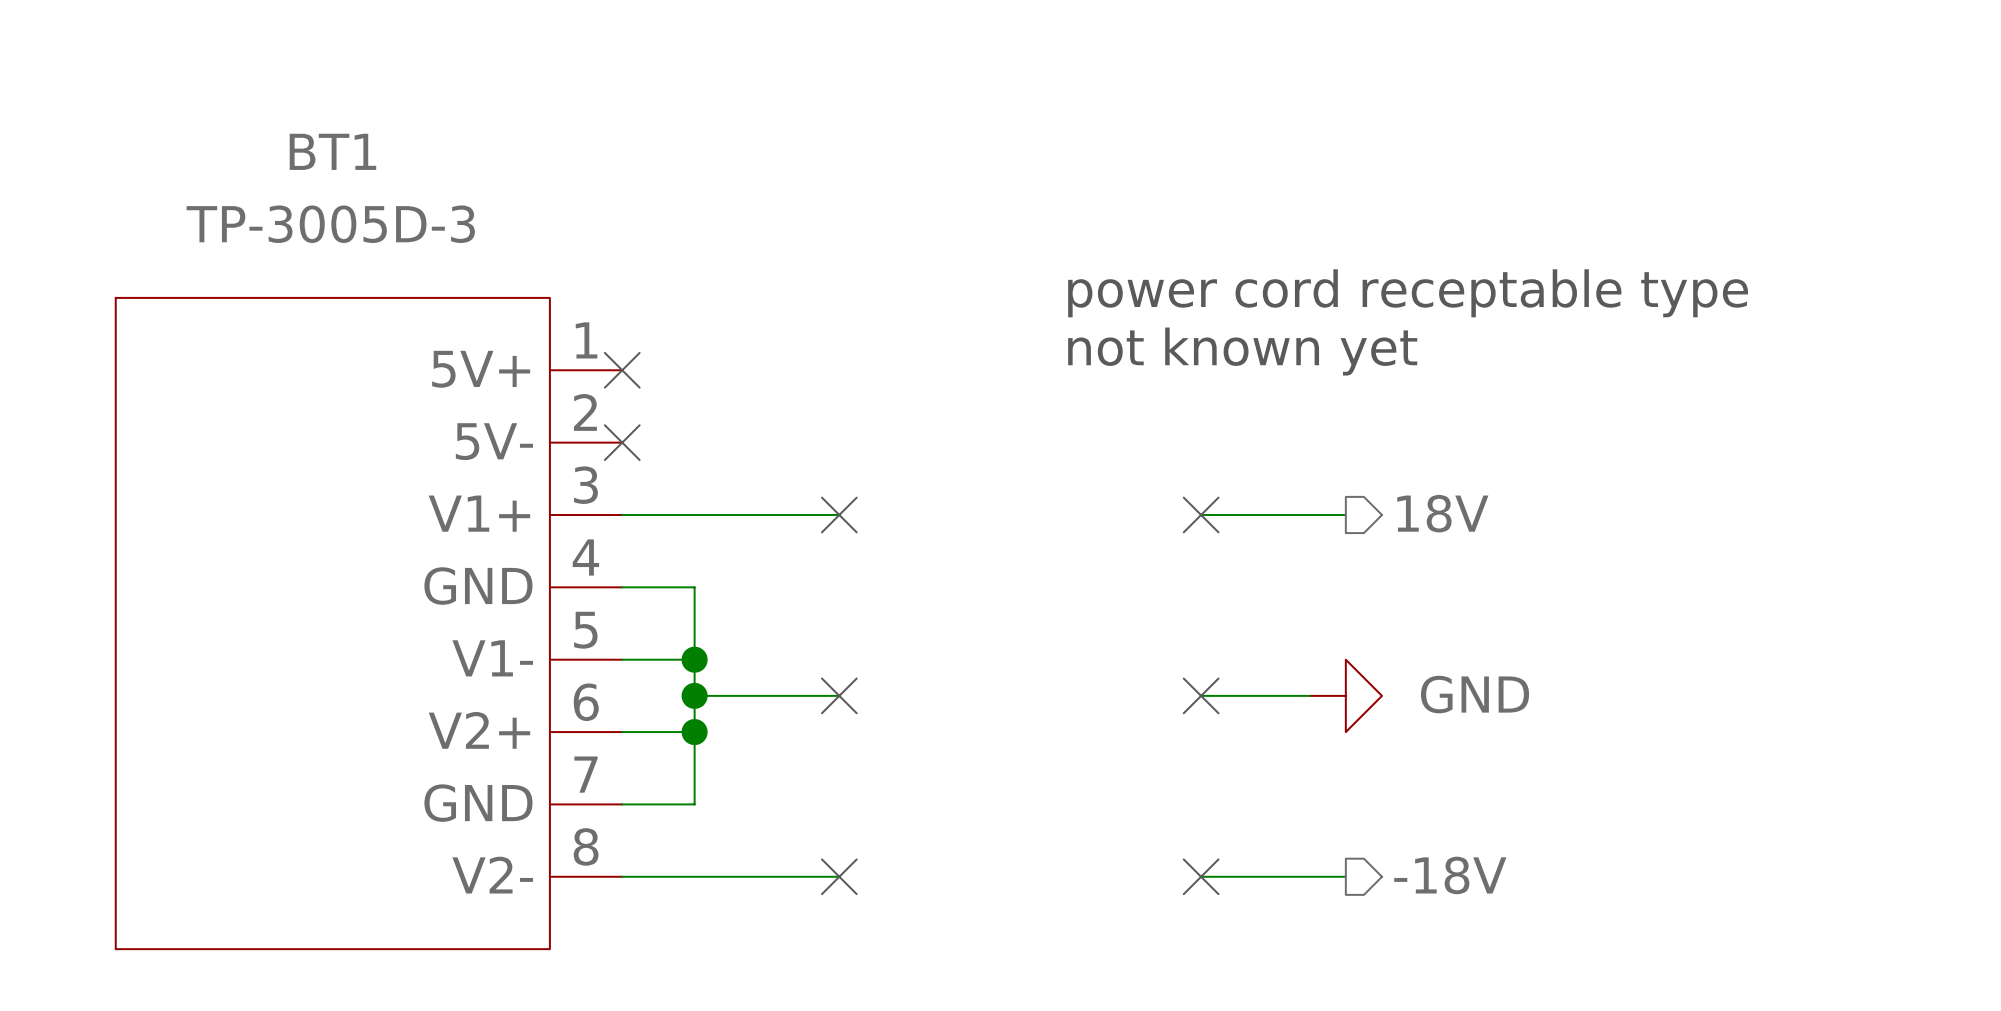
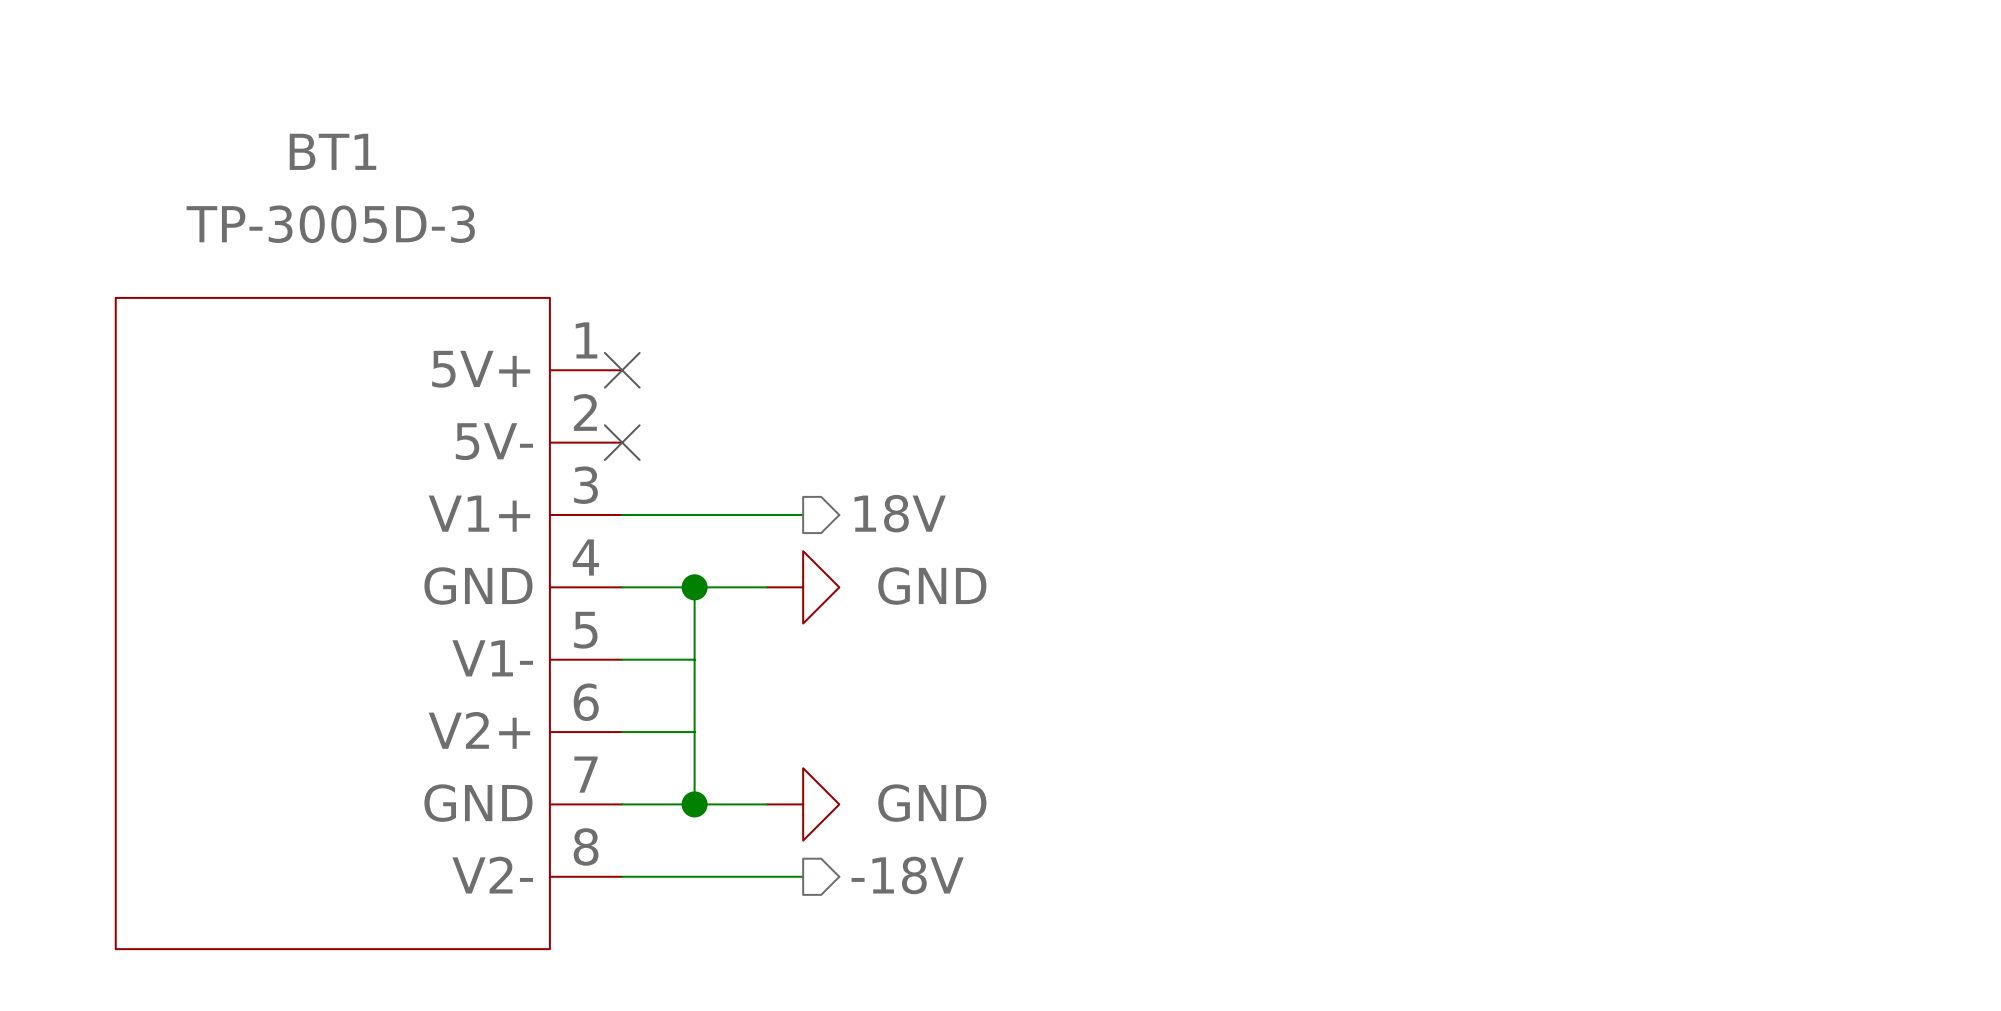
text: power cord receptable type (1408, 293) -> none
text: not known yet (1242, 351) -> none
hierarchical label position: 18V (1442, 513) -> 18V (900, 513)
wire: (803, 514) (839, 514) -> none
no-connect mark: (839, 514) -> none
wire: (1201, 514) (1345, 514) -> none
no-connect mark: (1201, 514) -> none
wire: none -> (694, 587) (766, 587)
junction: none -> (694, 587)
power symbol: none -> GND (803, 587)
junction: (694, 659) -> none
wire: (694, 695) (839, 695) -> none
junction: (694, 695) -> none
no-connect mark: (839, 695) -> none
wire: (1201, 695) (1309, 695) -> none
no-connect mark: (1201, 695) -> none
power symbol: GND (1345, 695) -> none
junction: (694, 732) -> none
wire: none -> (694, 804) (766, 804)
junction: none -> (694, 804)
power symbol: none -> GND (803, 804)
hierarchical label position: -18V (1450, 875) -> -18V (907, 875)
wire: (803, 876) (839, 876) -> none
no-connect mark: (839, 876) -> none
wire: (1201, 876) (1345, 876) -> none
no-connect mark: (1201, 876) -> none

